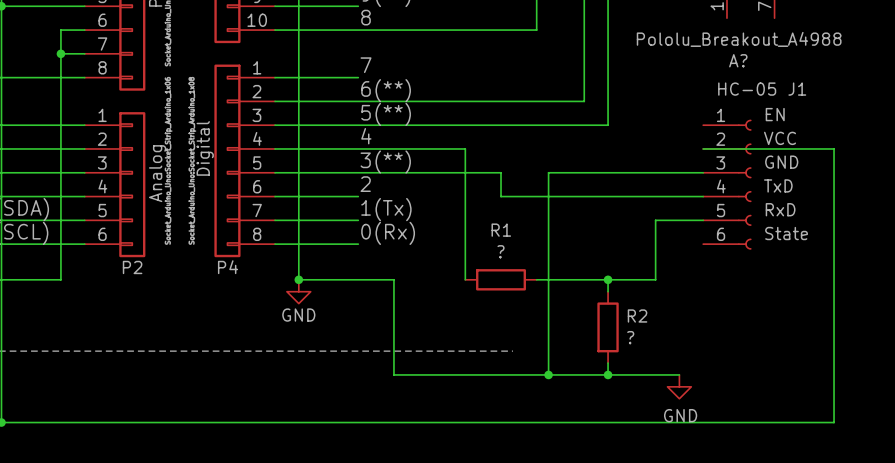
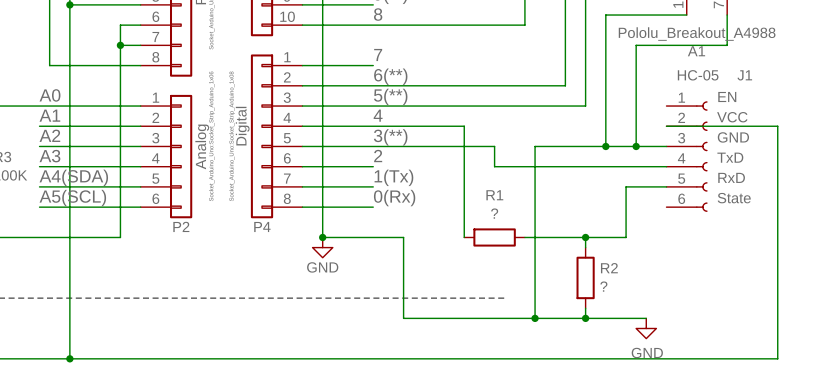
wire: none -> (686, 15) (605, 15) (605, 146)
wire: none -> (727, 15) (727, 45) (636, 45) (636, 146)
A? name: A? (738, 60) -> A1 (696, 51)
junction: none -> (605, 146)
junction: none -> (636, 146)

